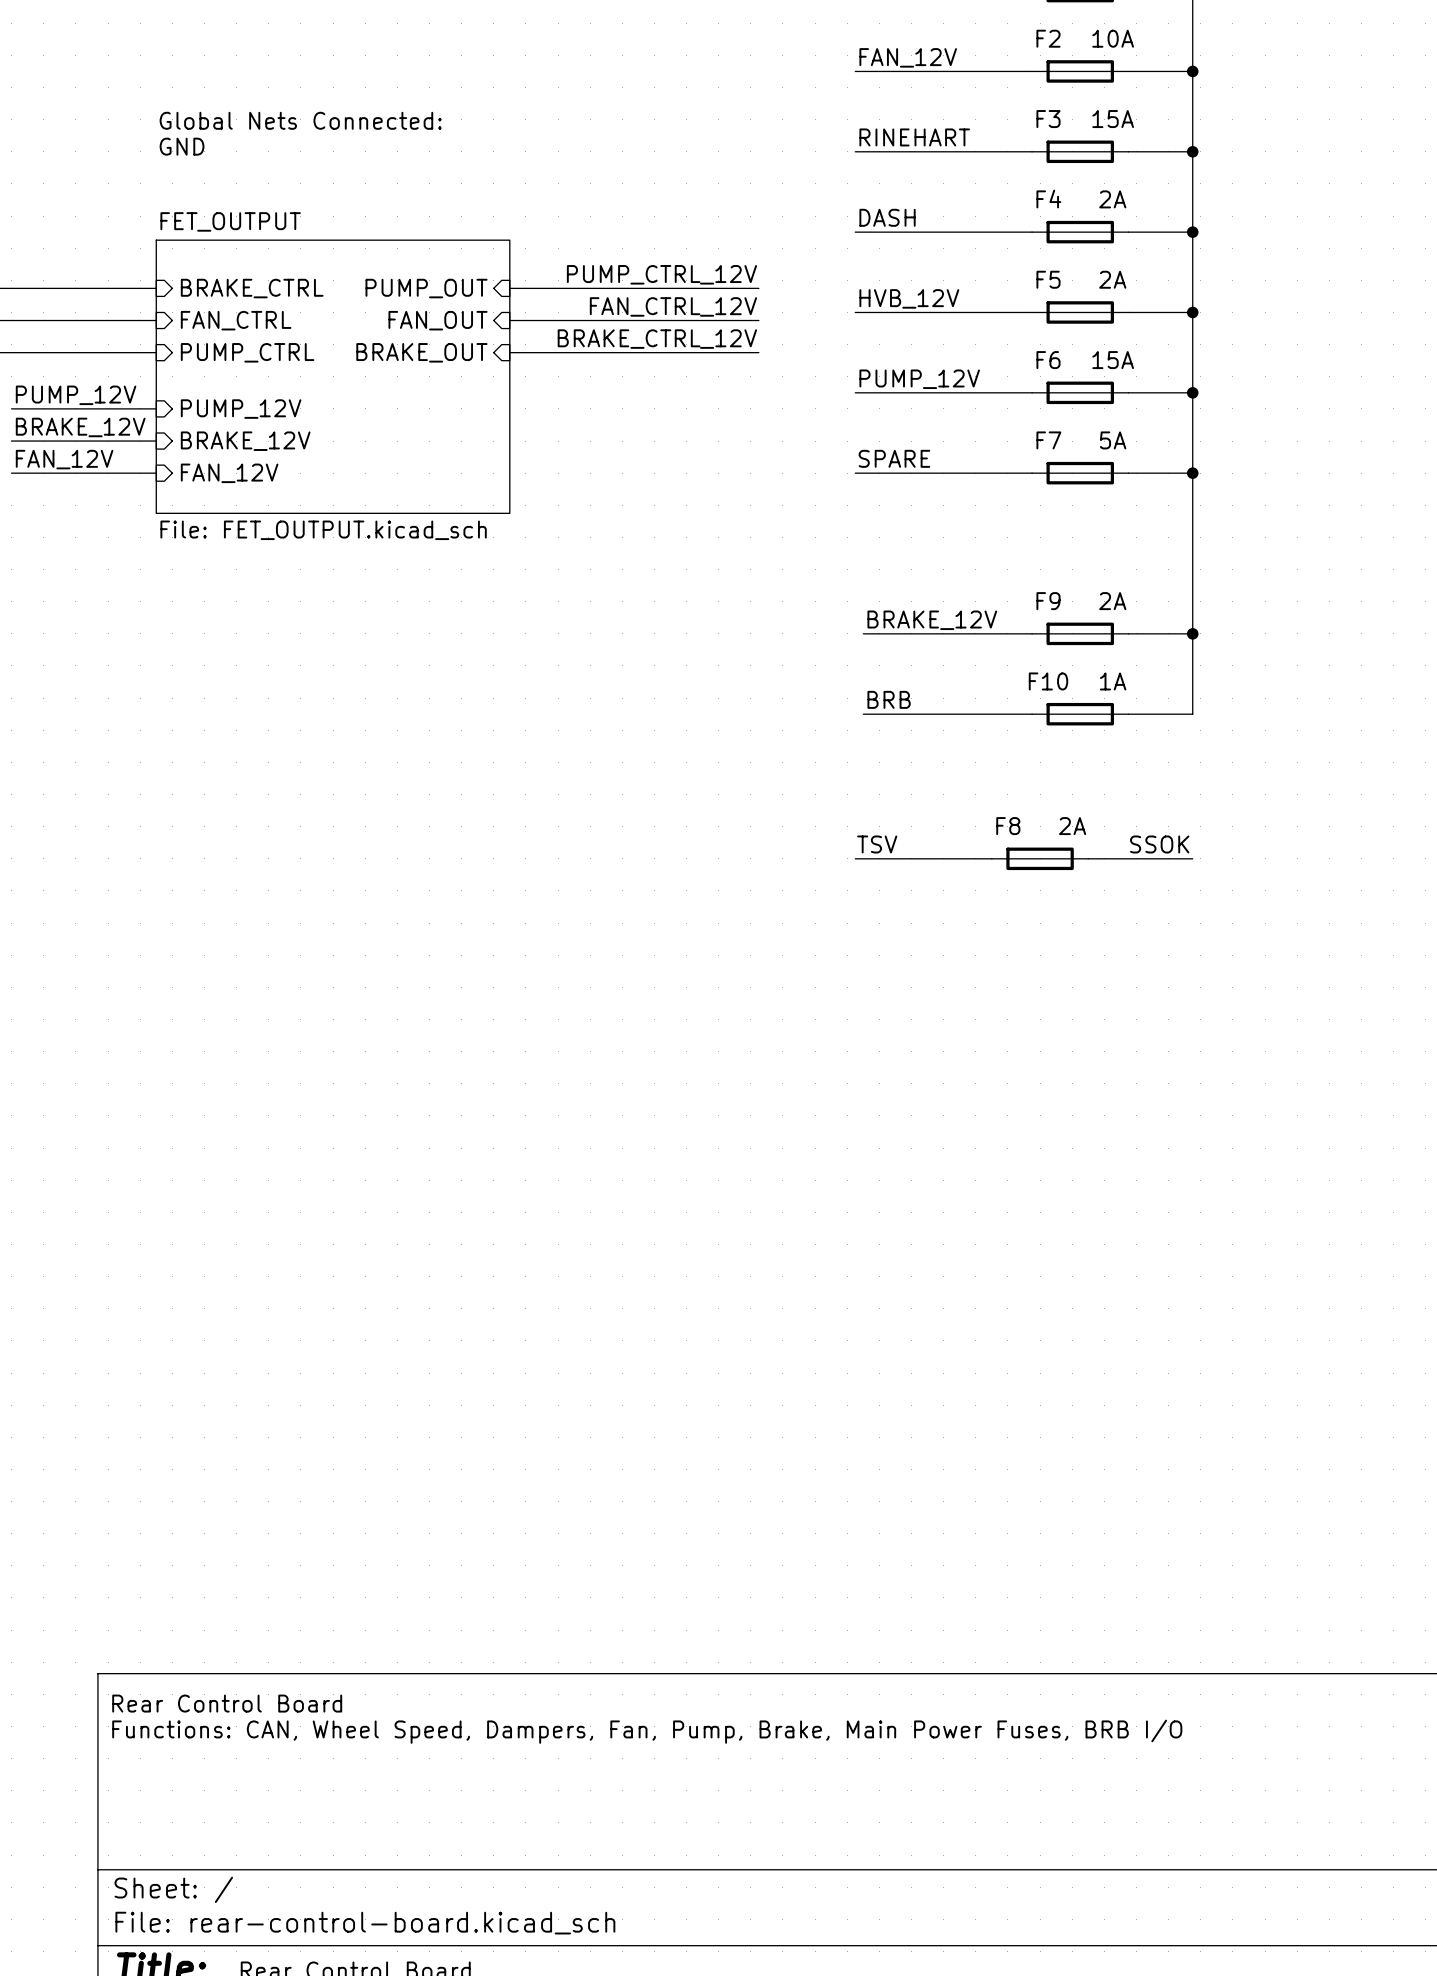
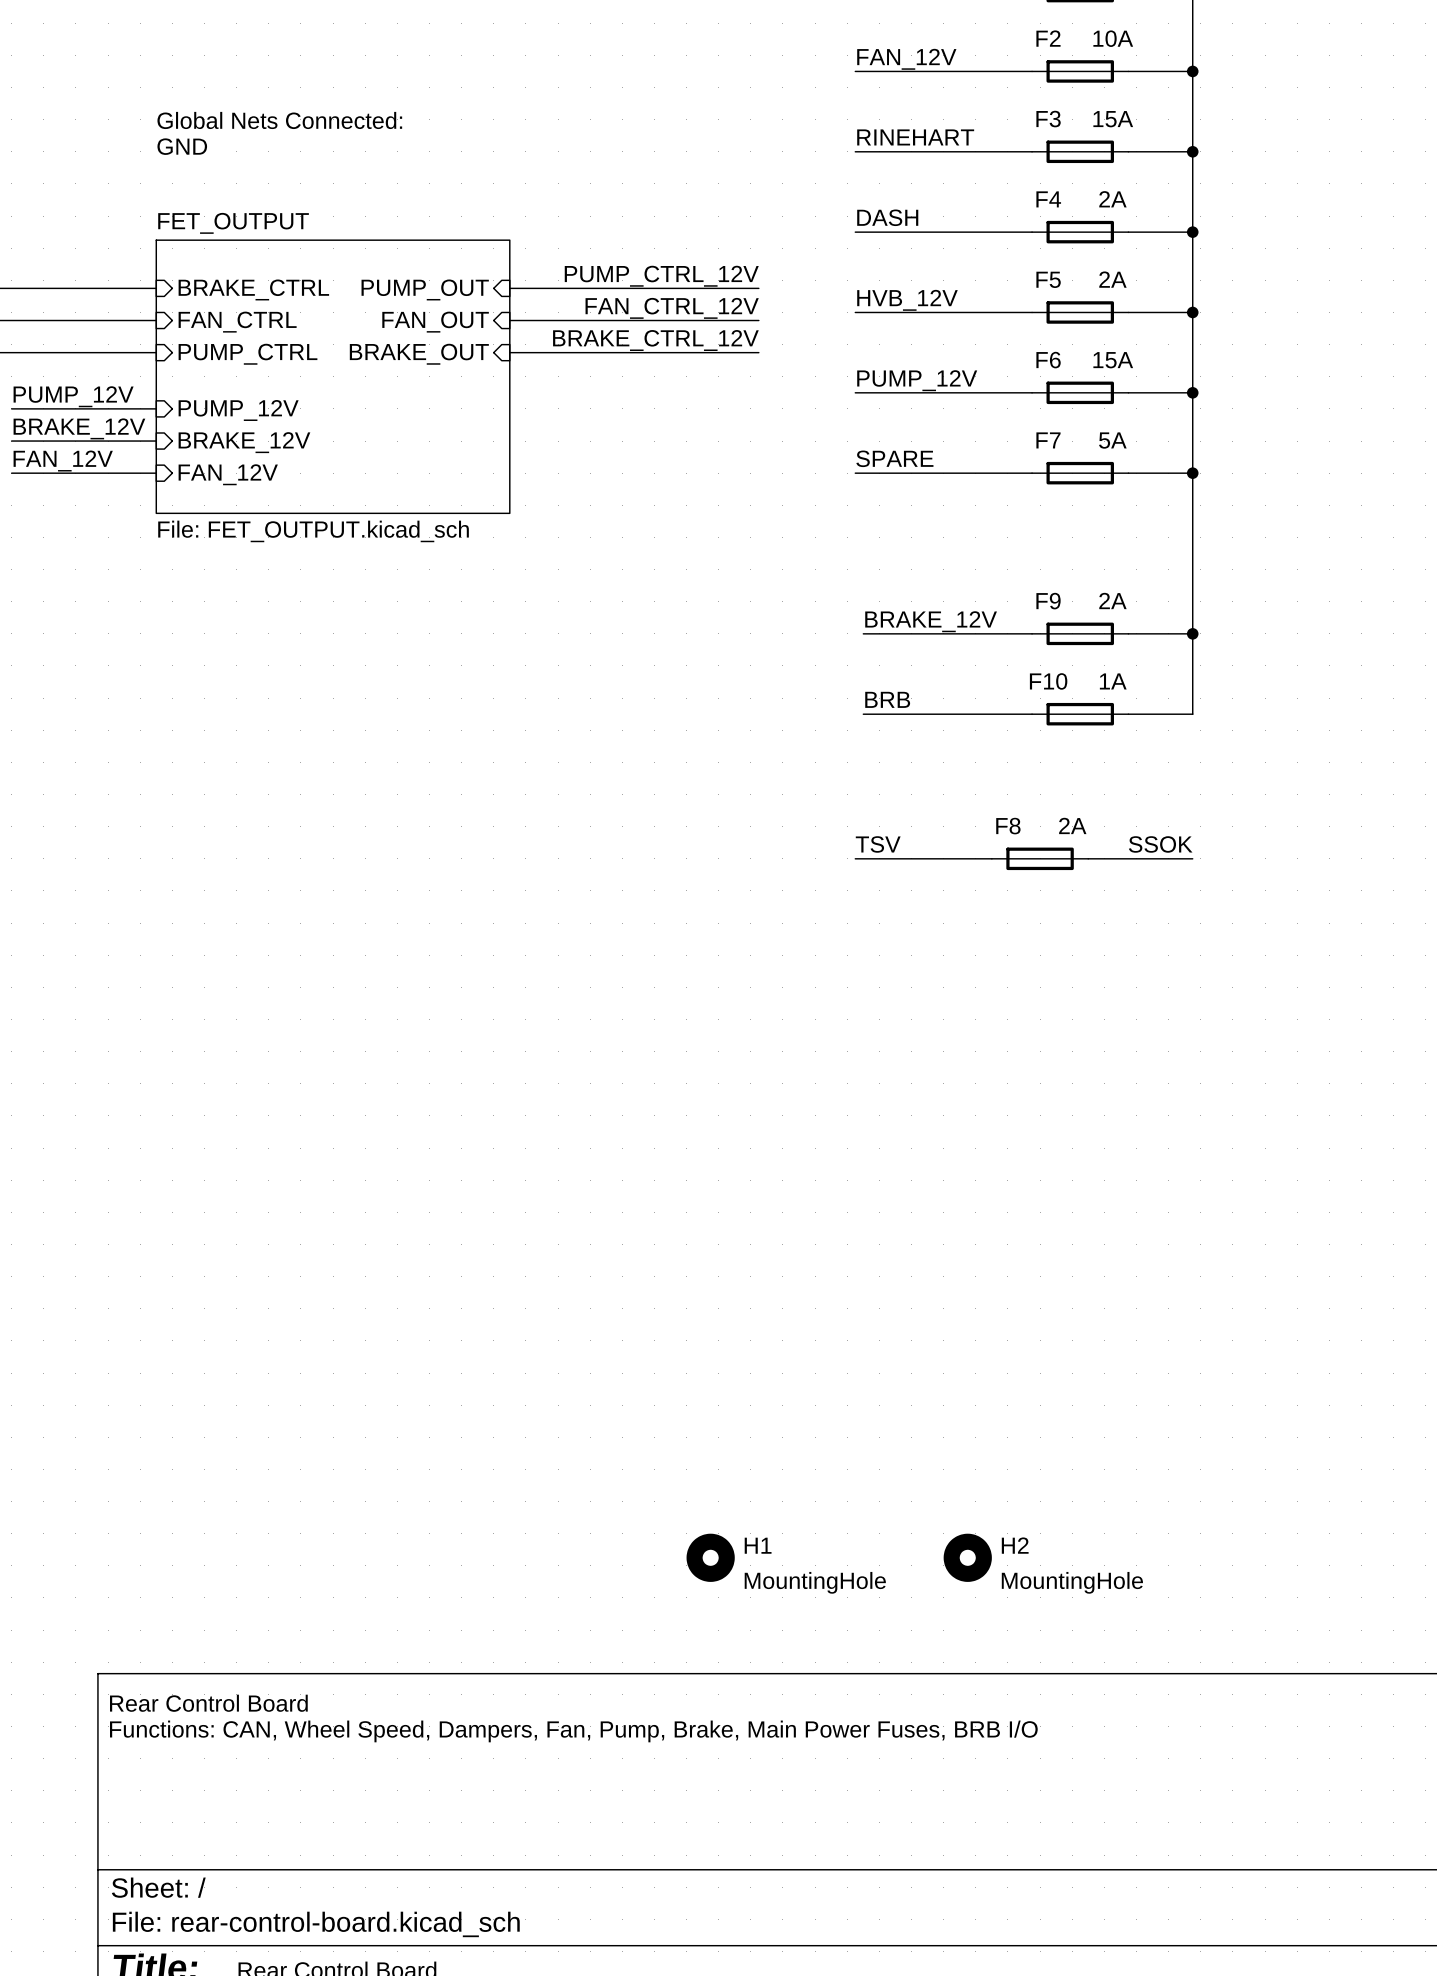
H1: none -> MountingHole (710, 1557)
H2: none -> MountingHole (967, 1557)

